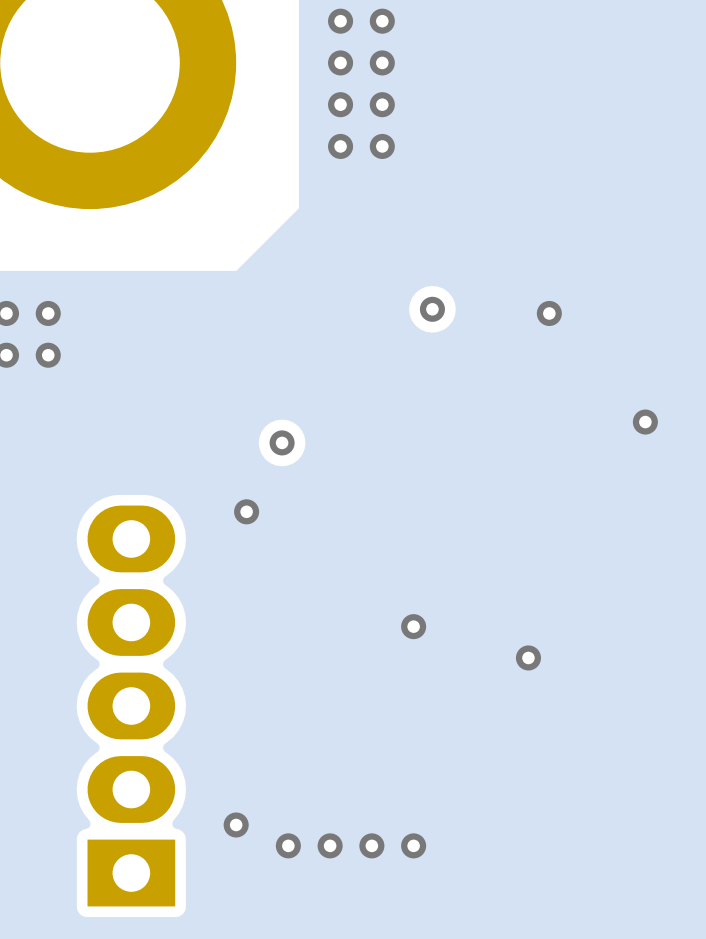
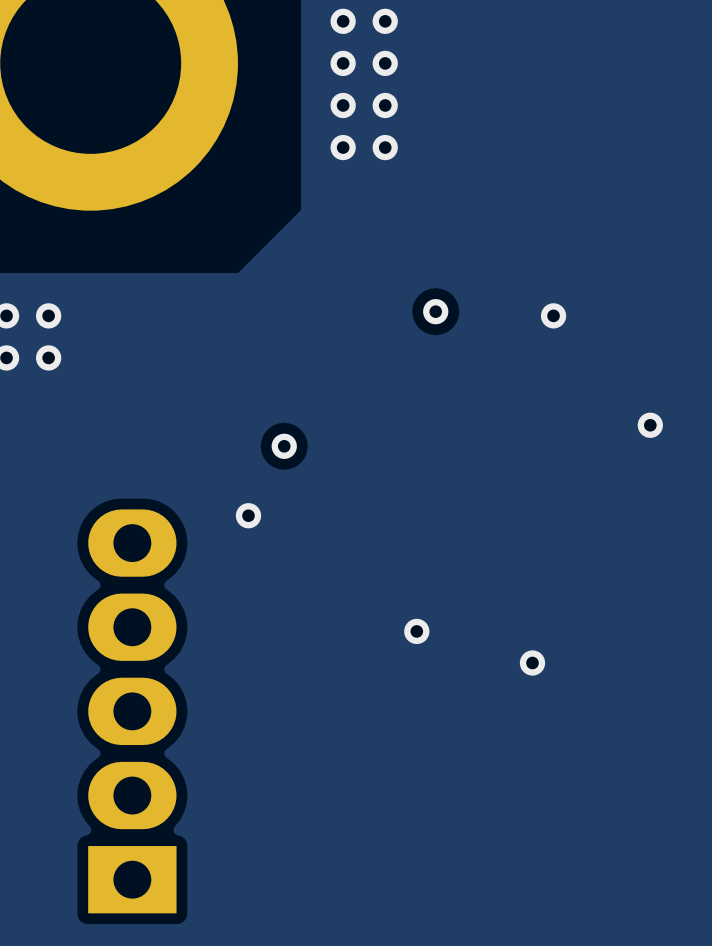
via: (236, 825) -> none
via: (288, 845) -> none
via: (330, 845) -> none
via: (371, 845) -> none
via: (413, 845) -> none

